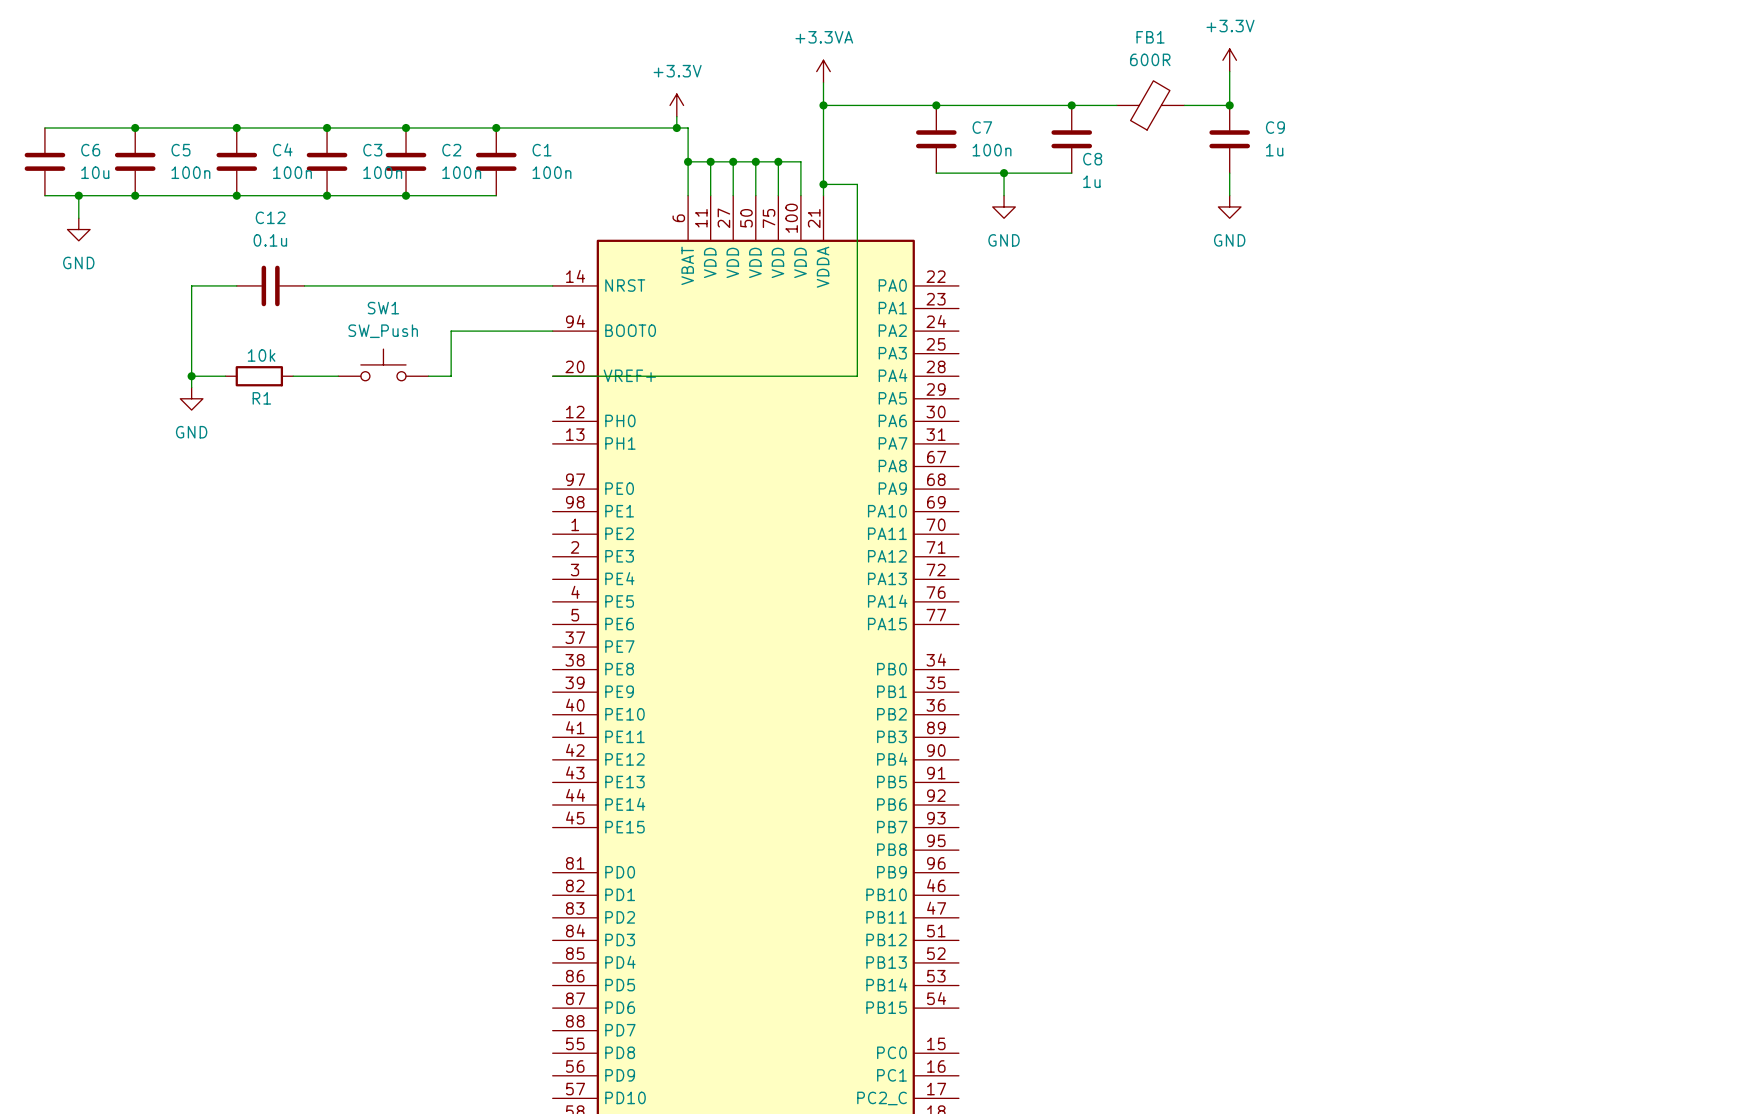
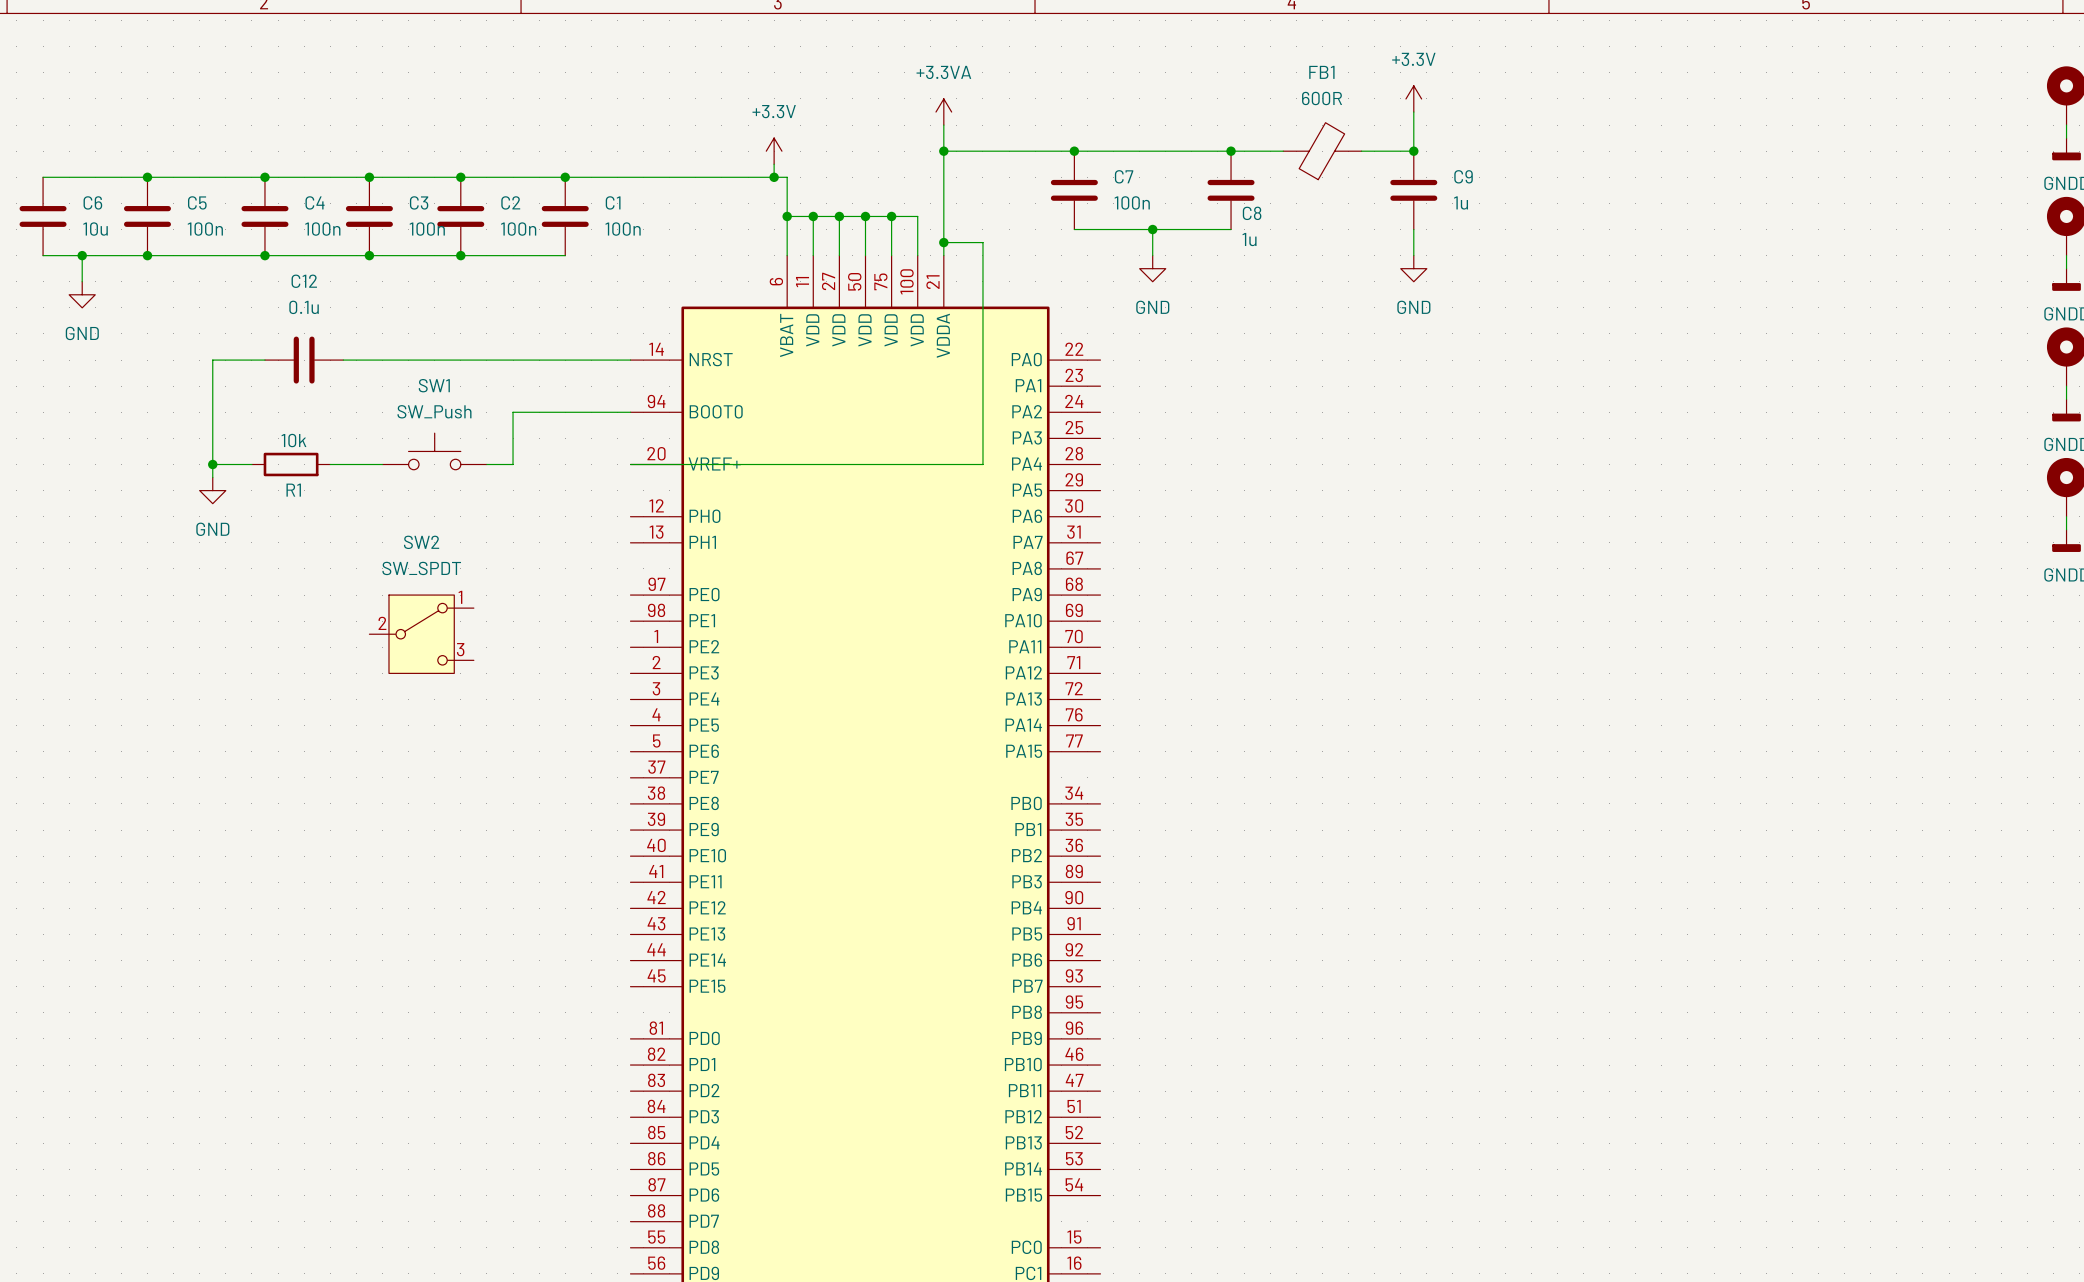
SW2: none -> SW_SPDT (421, 634)

